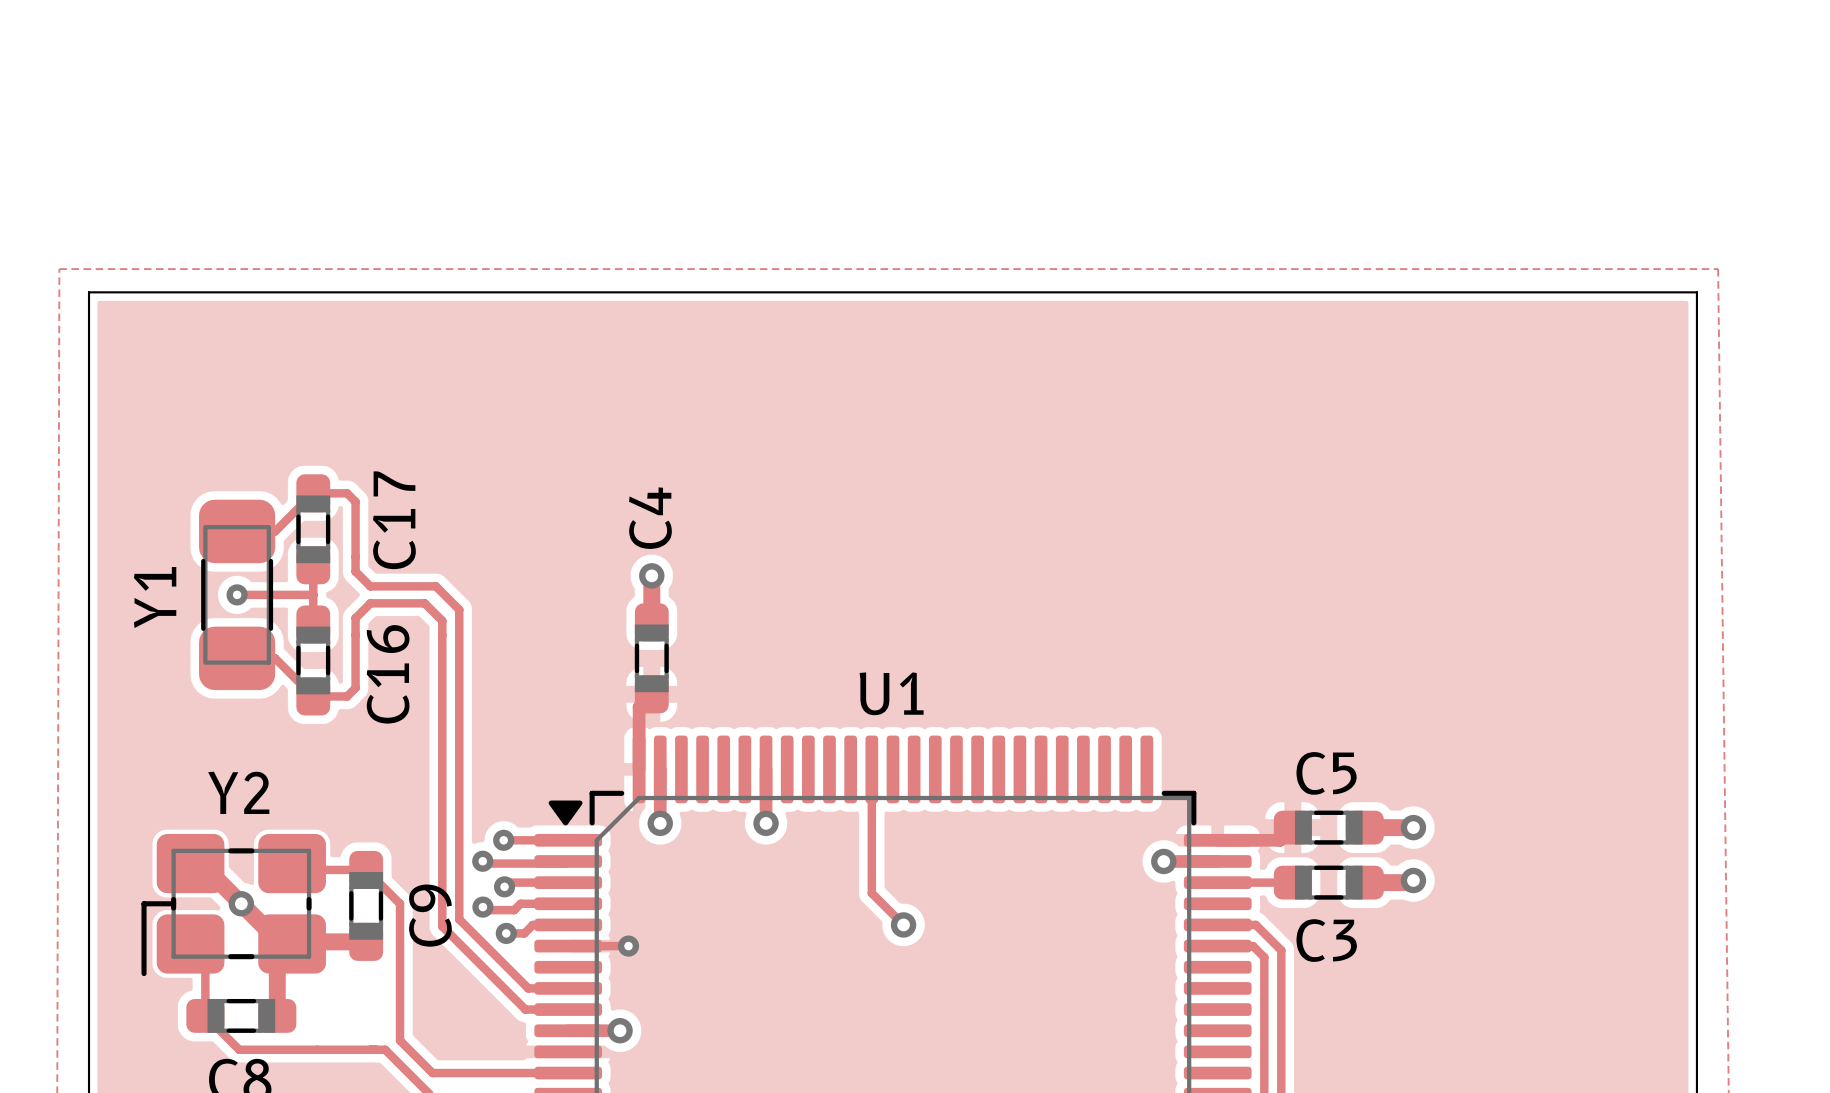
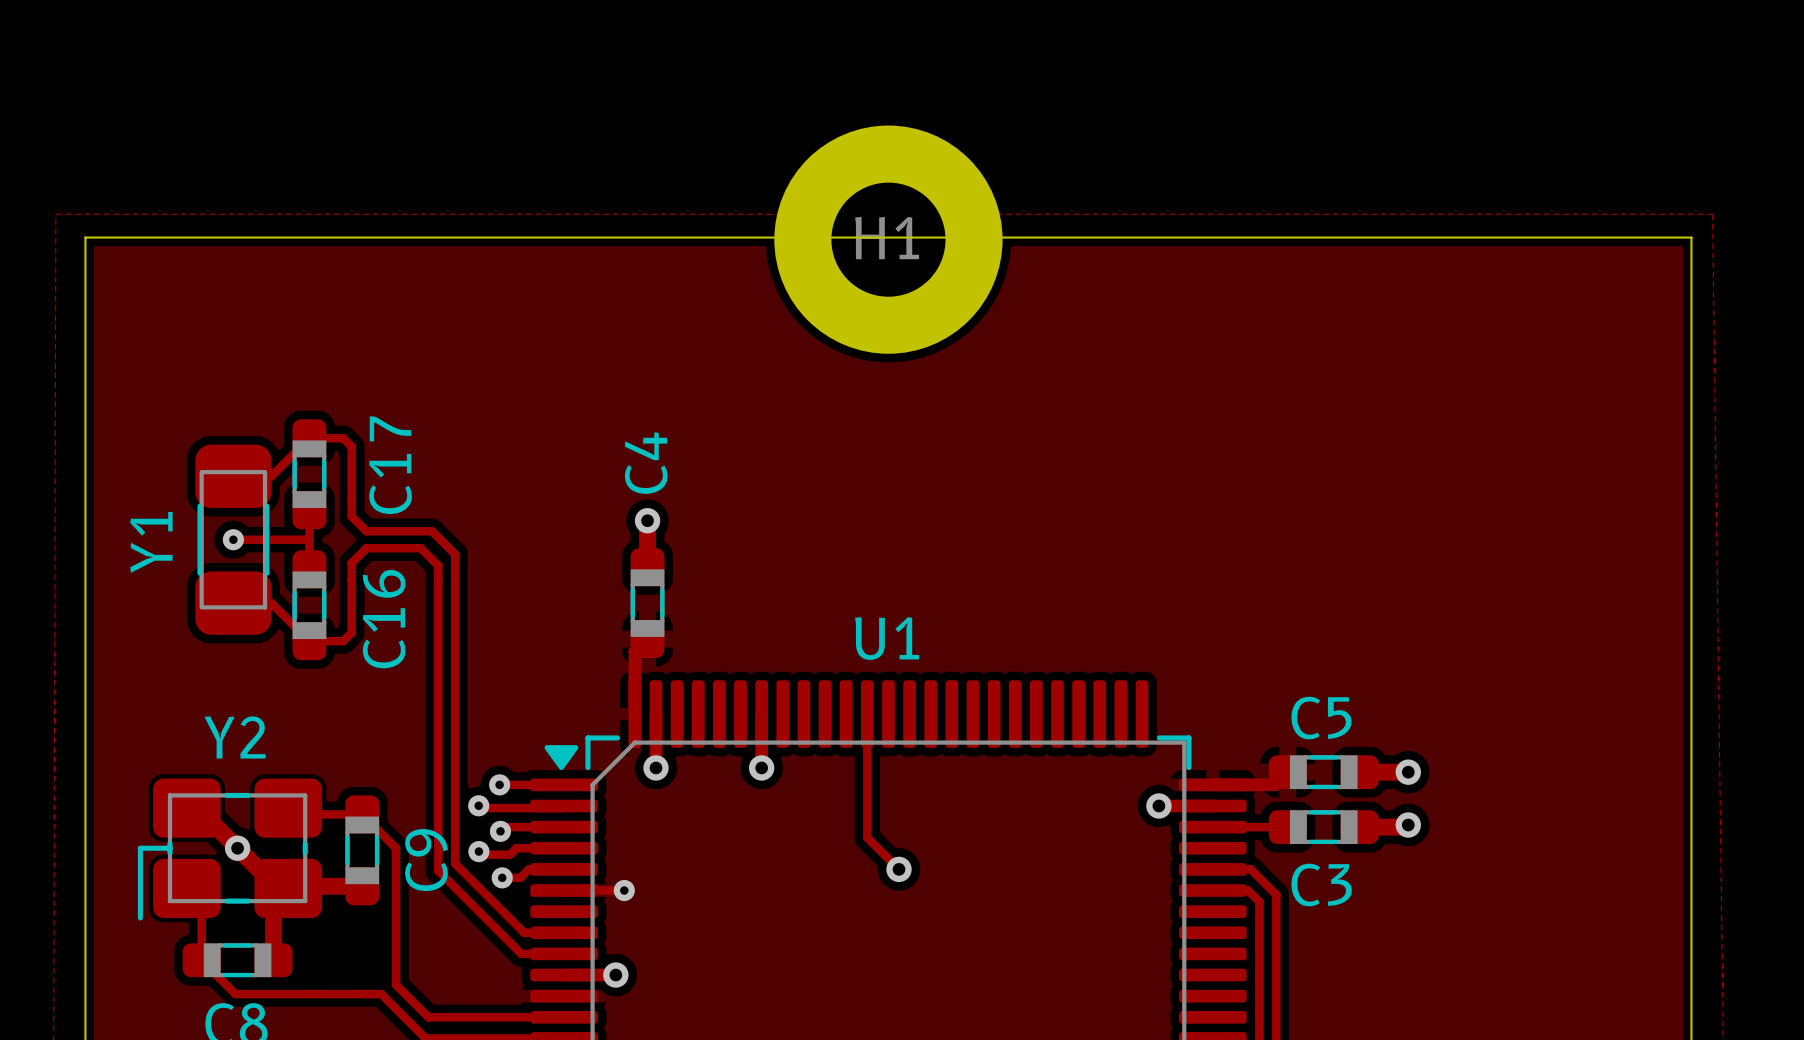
H1: none -> (888, 239)

